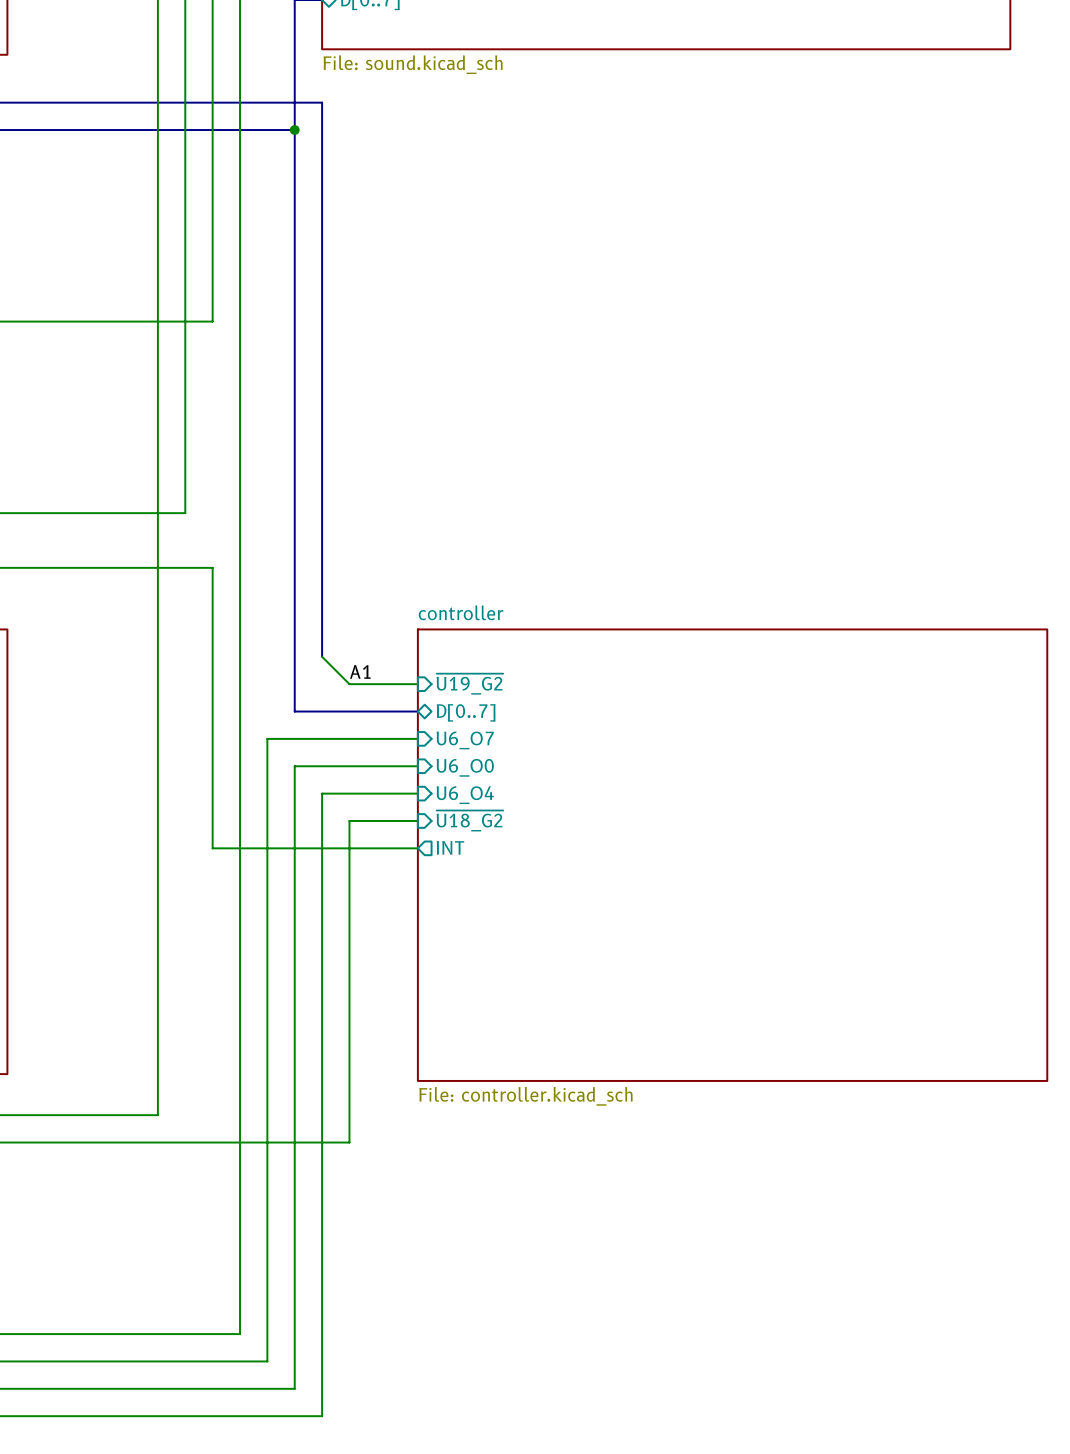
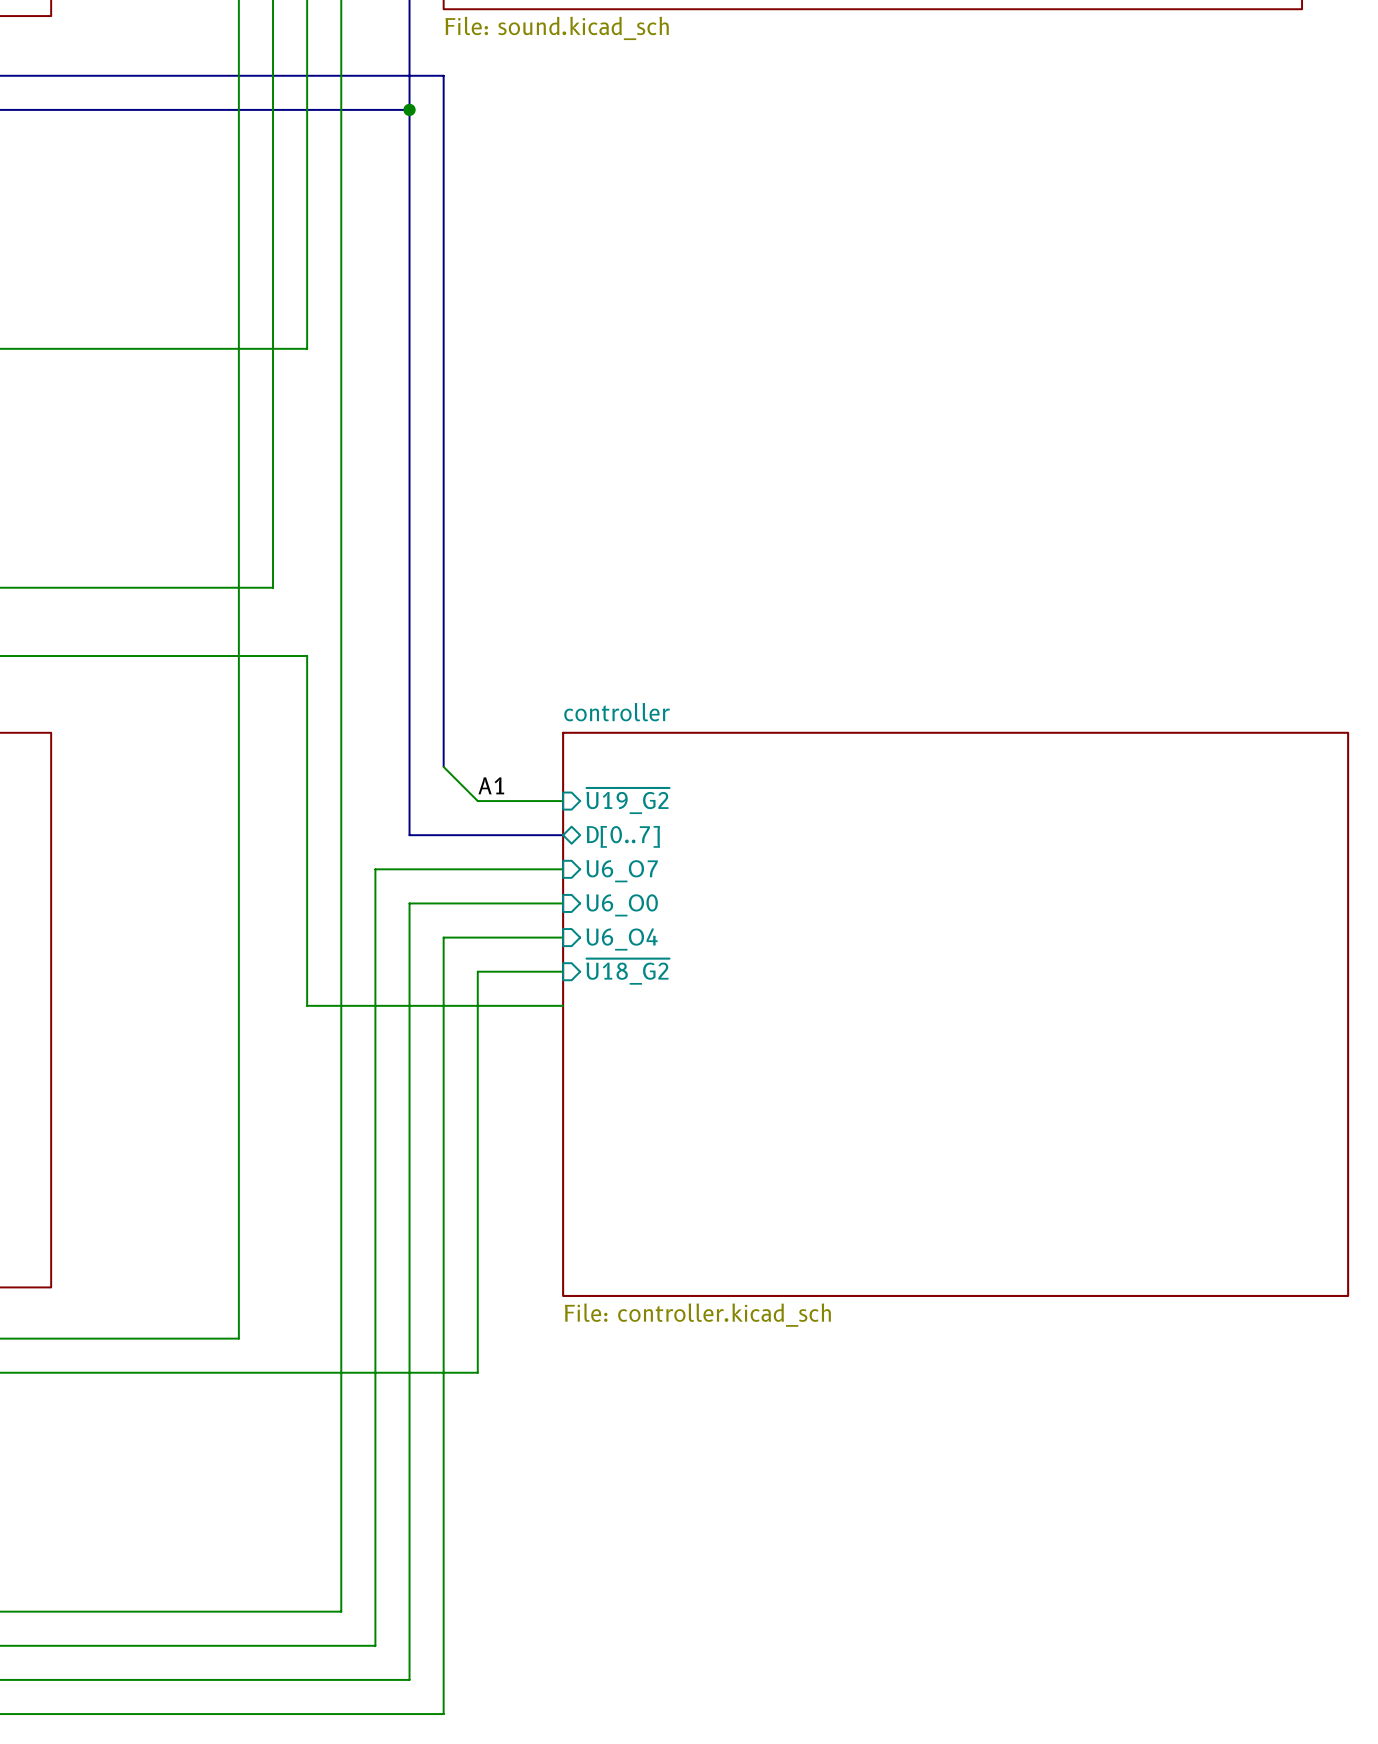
sheet pin: INT (450, 847) -> none

